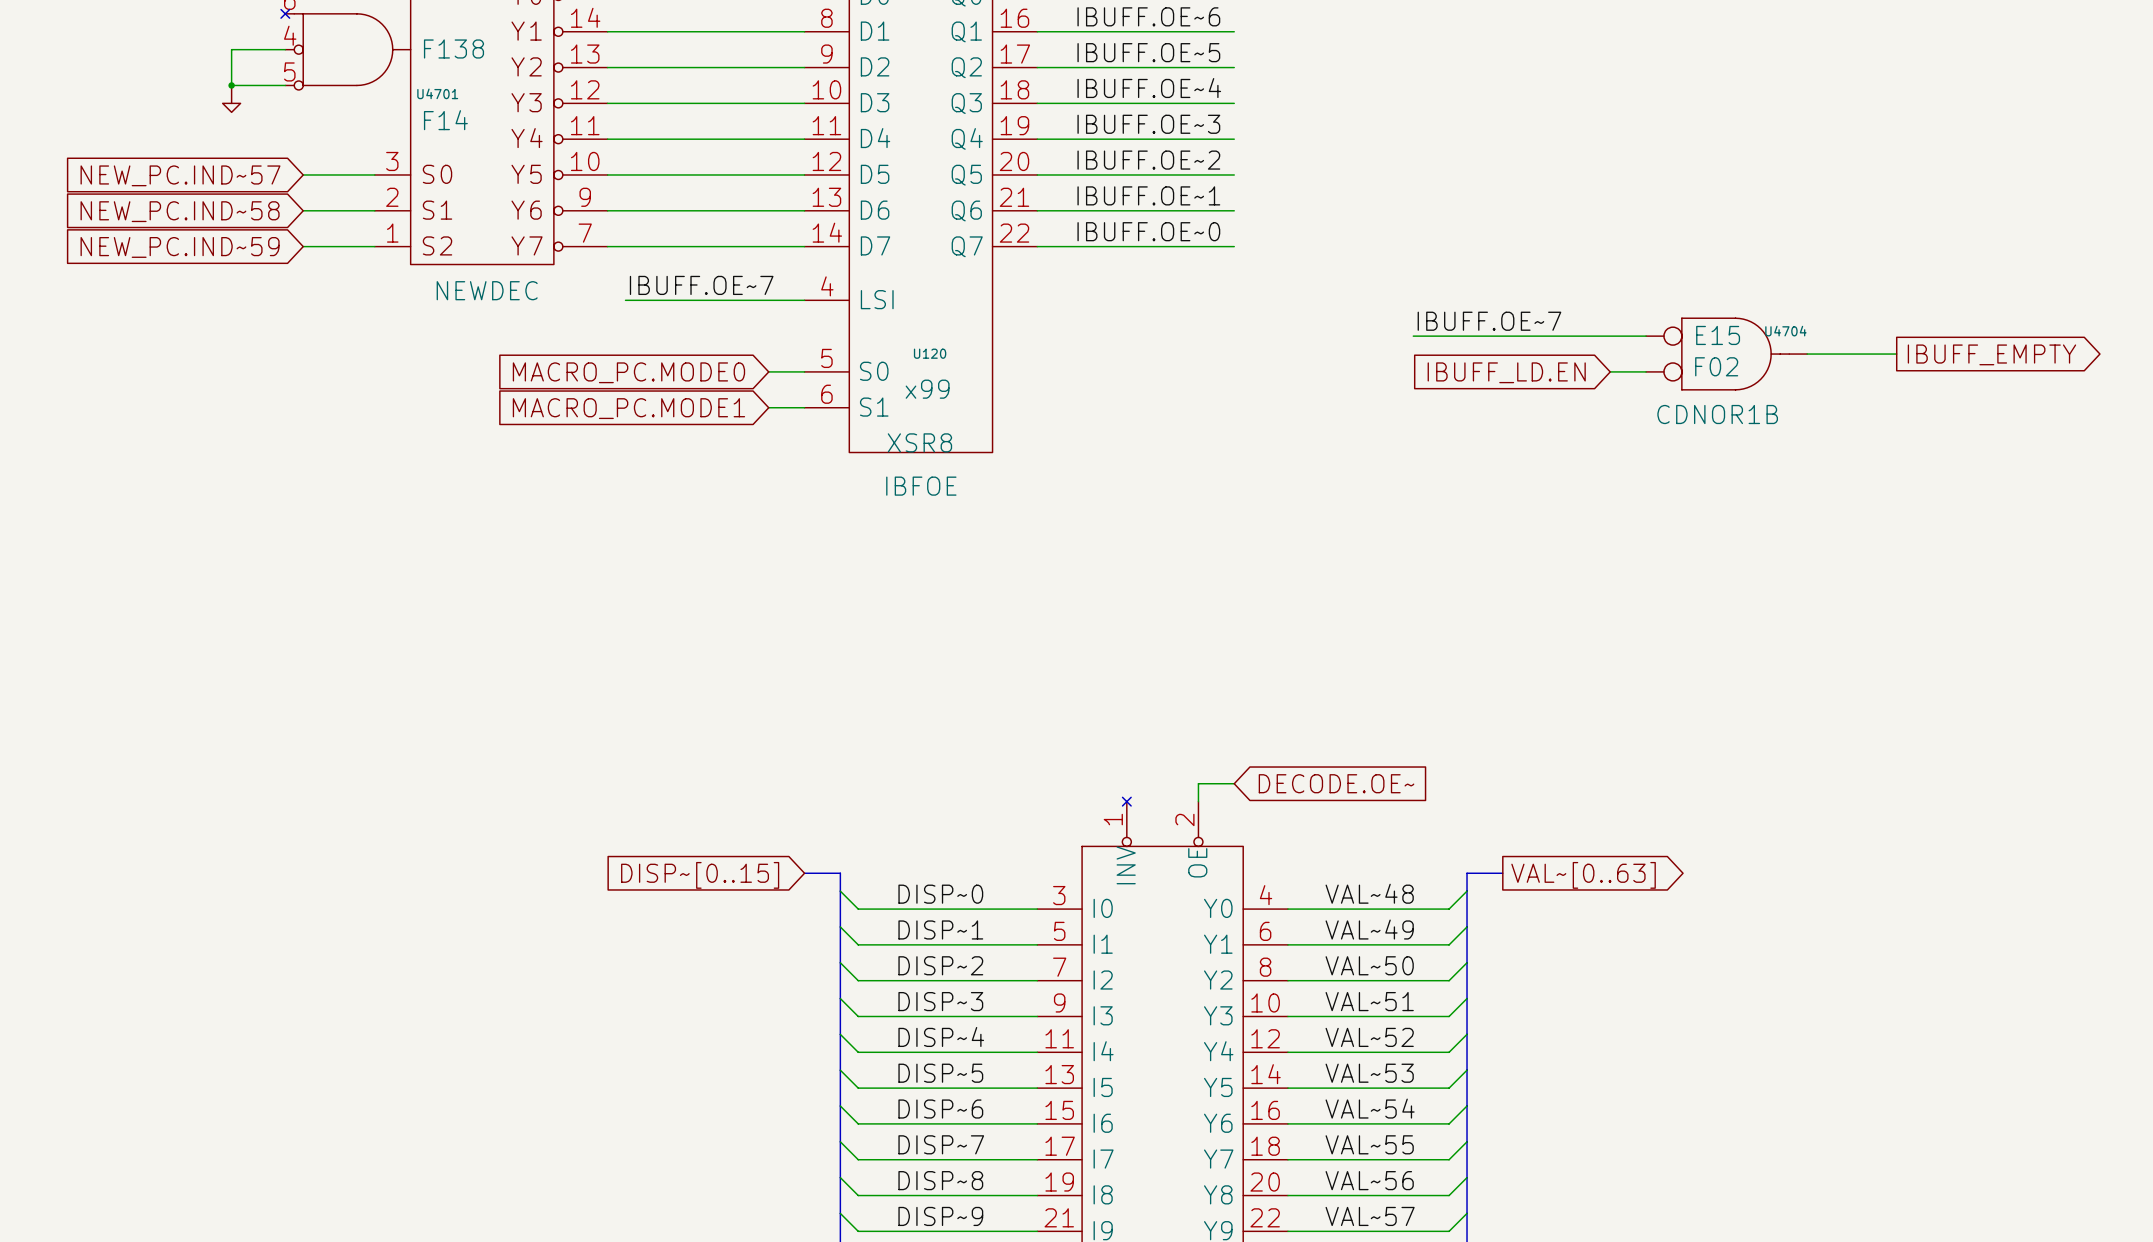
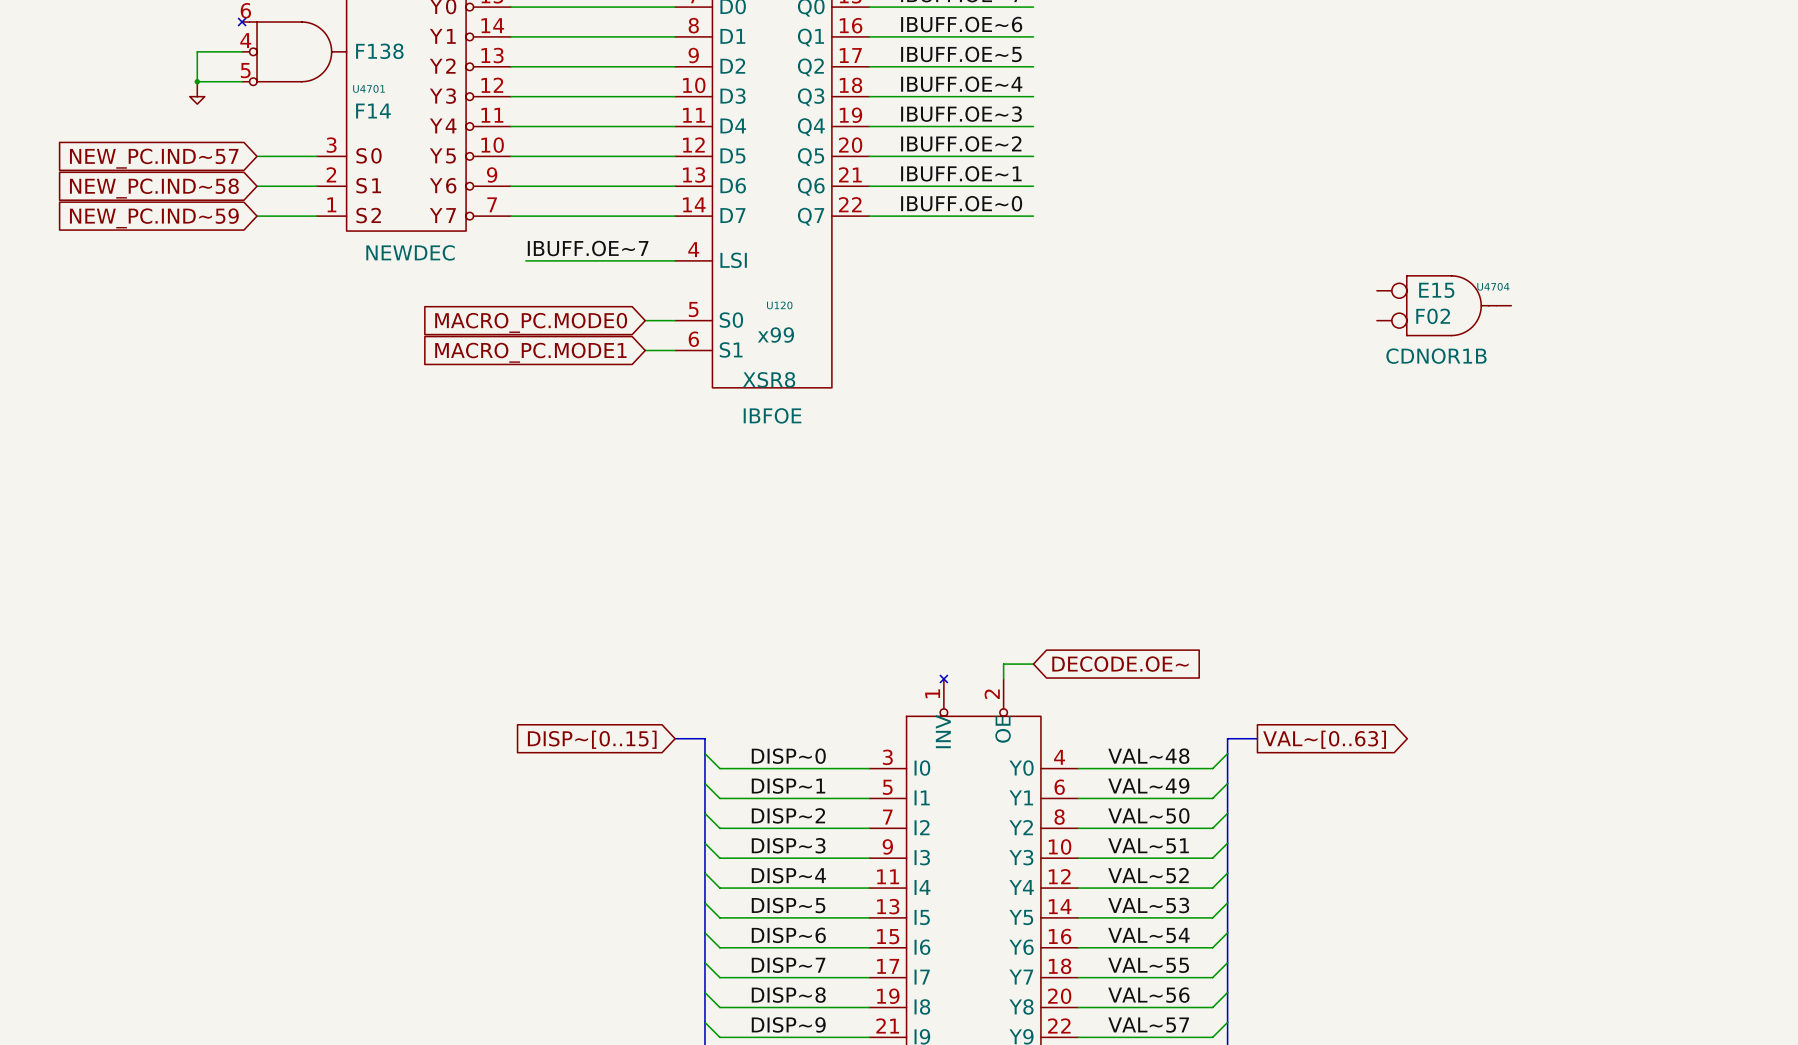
label: IBUFF.OE~7 (1489, 321) -> none
wire: (1413, 336) (1646, 336) -> none
wire: (1807, 354) (1896, 354) -> none
global label: IBUFF_EMPTY (1991, 354) -> none
wire: (1610, 371) (1646, 371) -> none
global label: IBUFF_LD.EN (1506, 372) -> none

